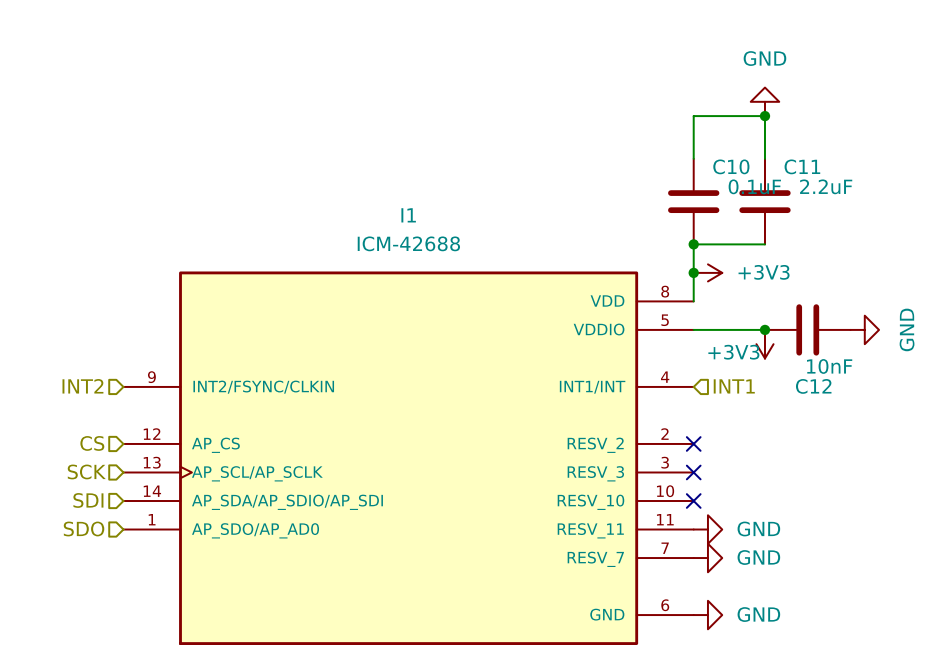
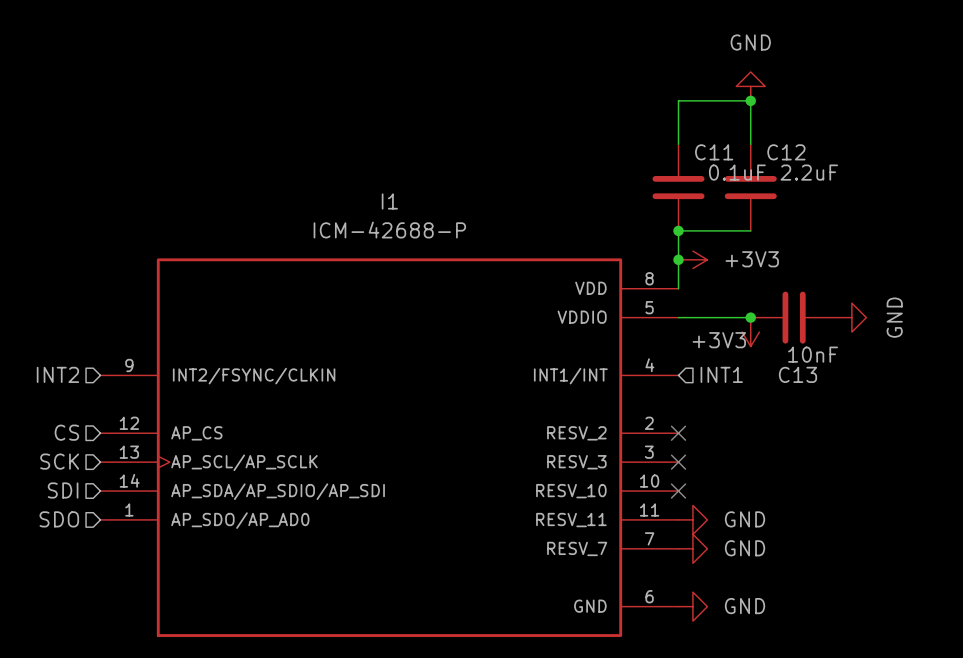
C10 name: C10 (731, 166) -> C11 (714, 152)
C11 name: C11 (802, 166) -> C12 (786, 152)
I1 value: ICM-42688 (408, 243) -> ICM-42688-P (389, 230)
C12 name: C12 (813, 386) -> C13 (797, 374)

